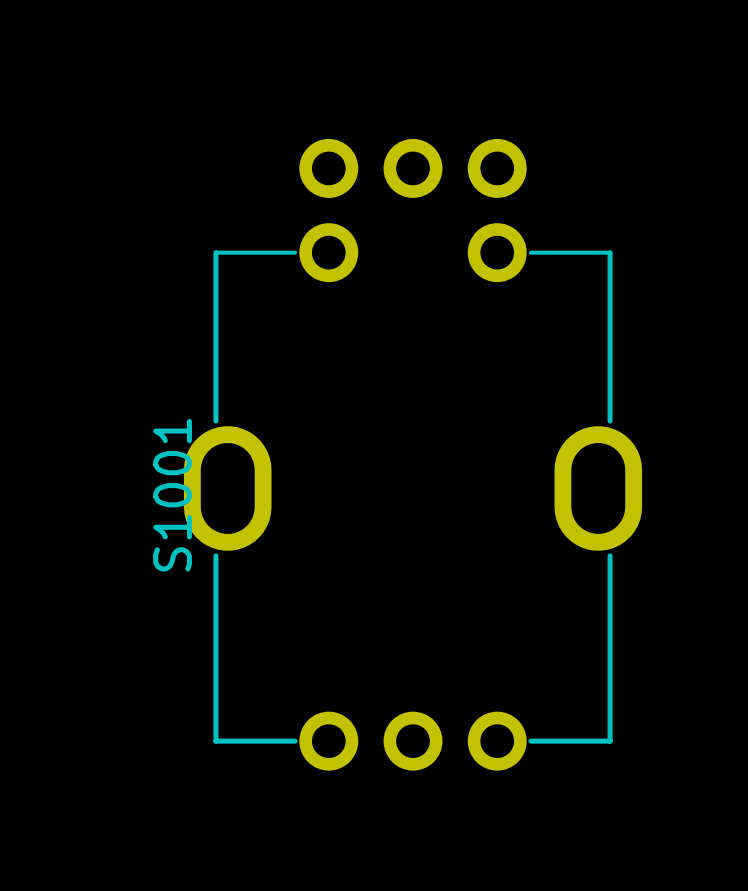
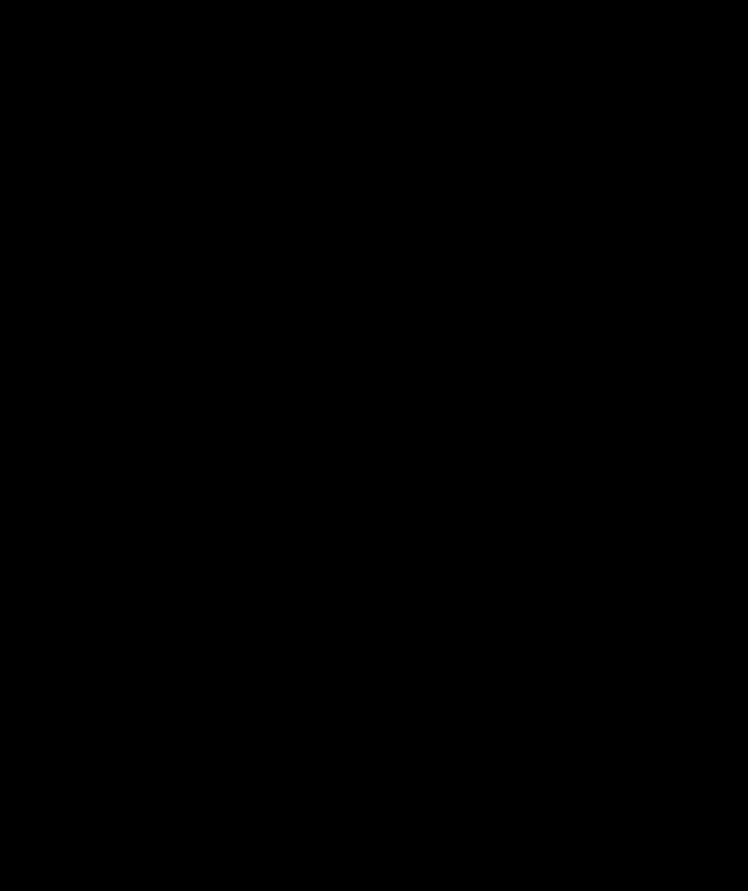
S1001: (413, 454) -> none

